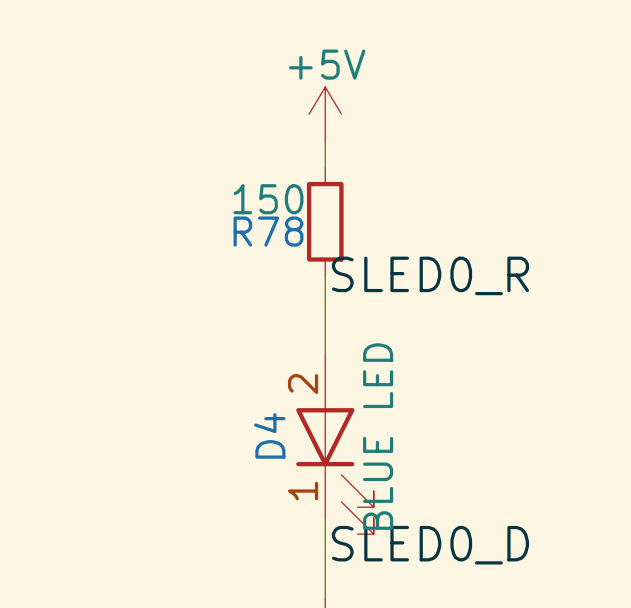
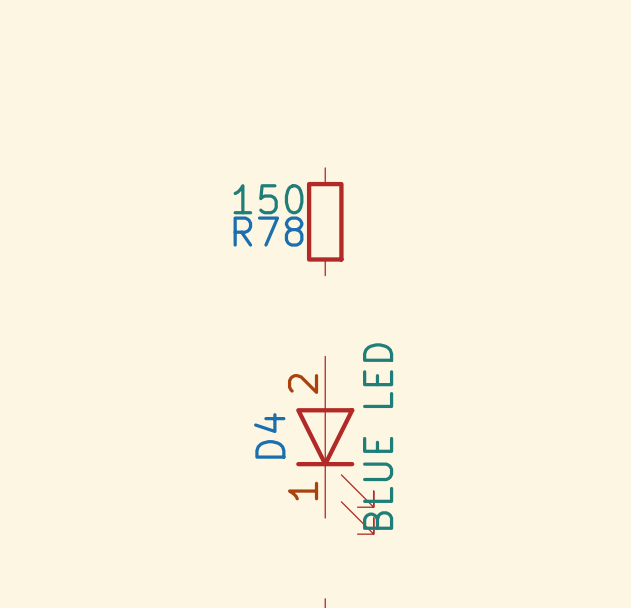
power symbol: +5V (325, 114) -> none
wire: (325, 141) (325, 167) -> none
wire: (325, 275) (325, 356) -> none
label: SLED0_R (430, 275) -> none
wire: (325, 517) (325, 598) -> none
label: SLED0_D (430, 545) -> none

